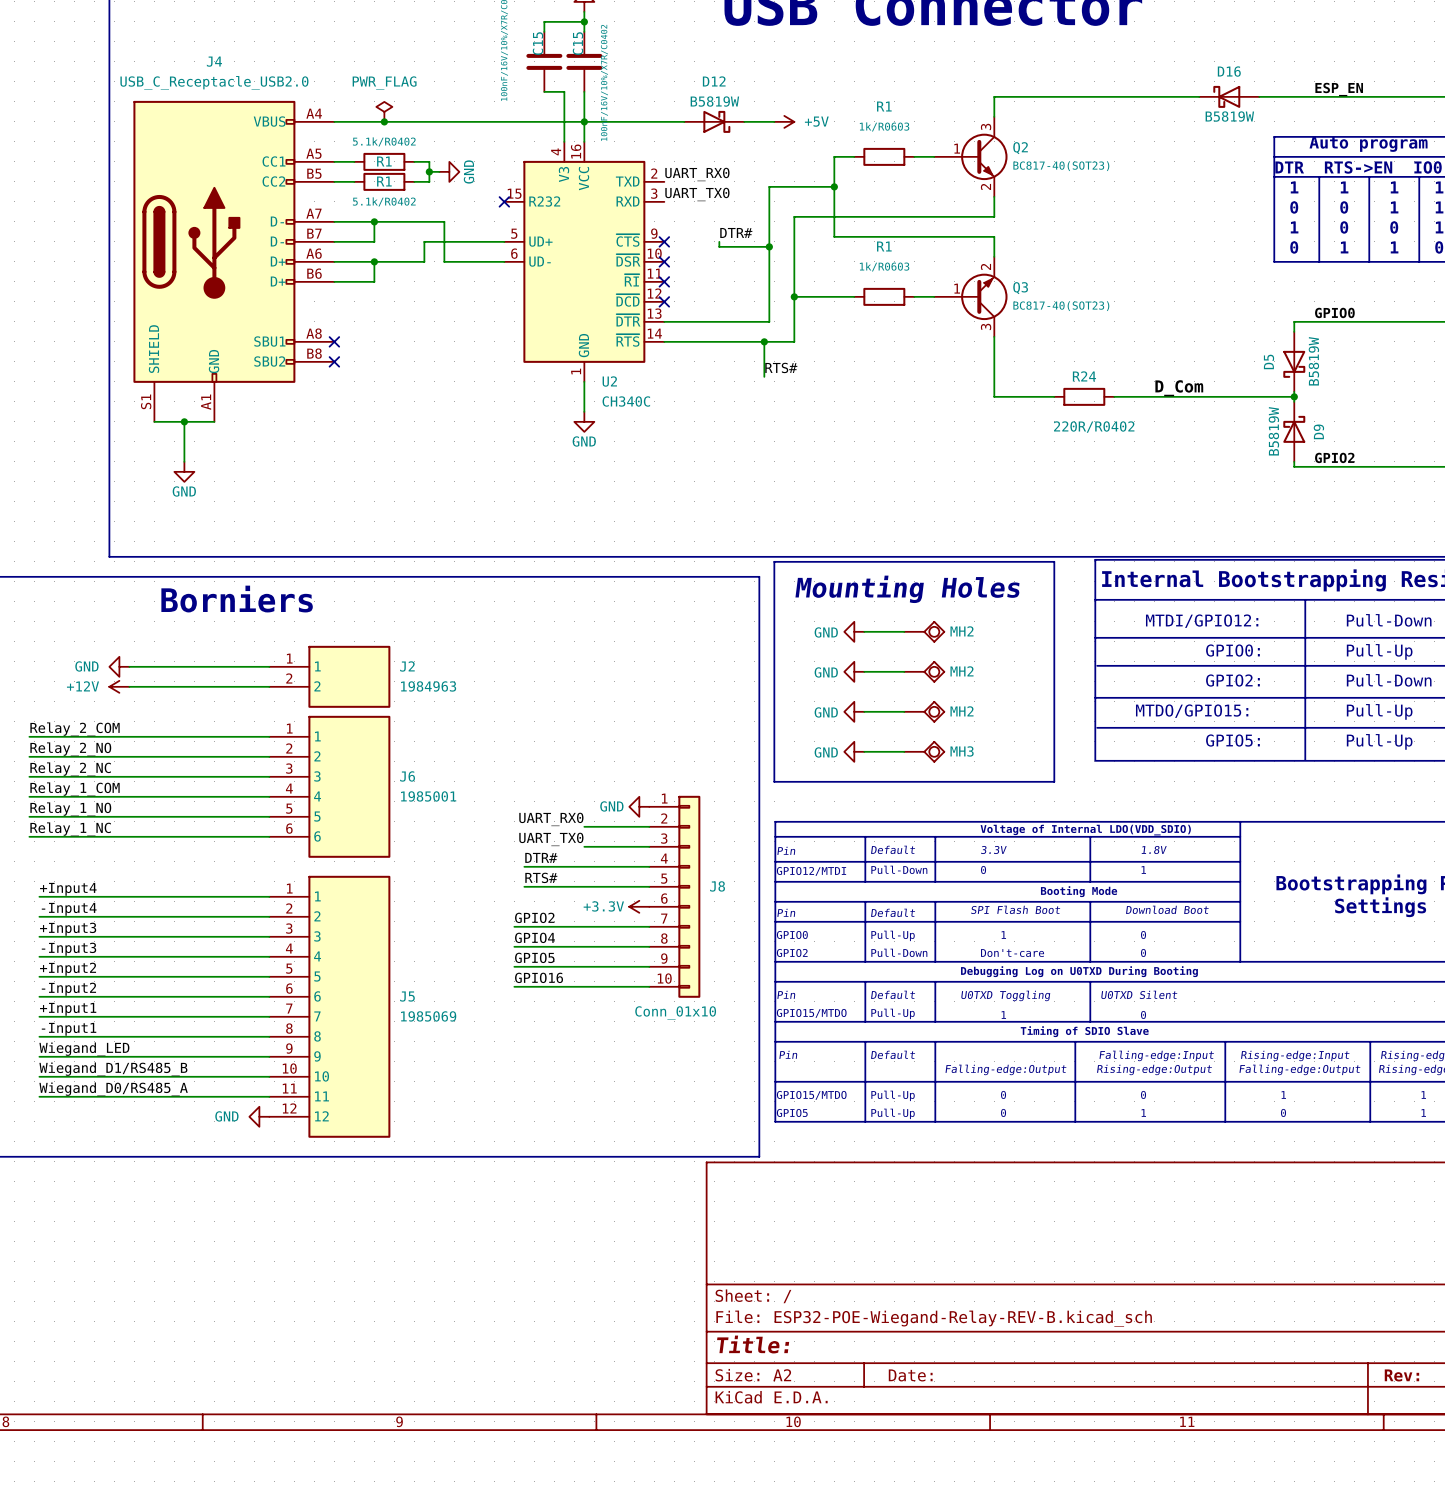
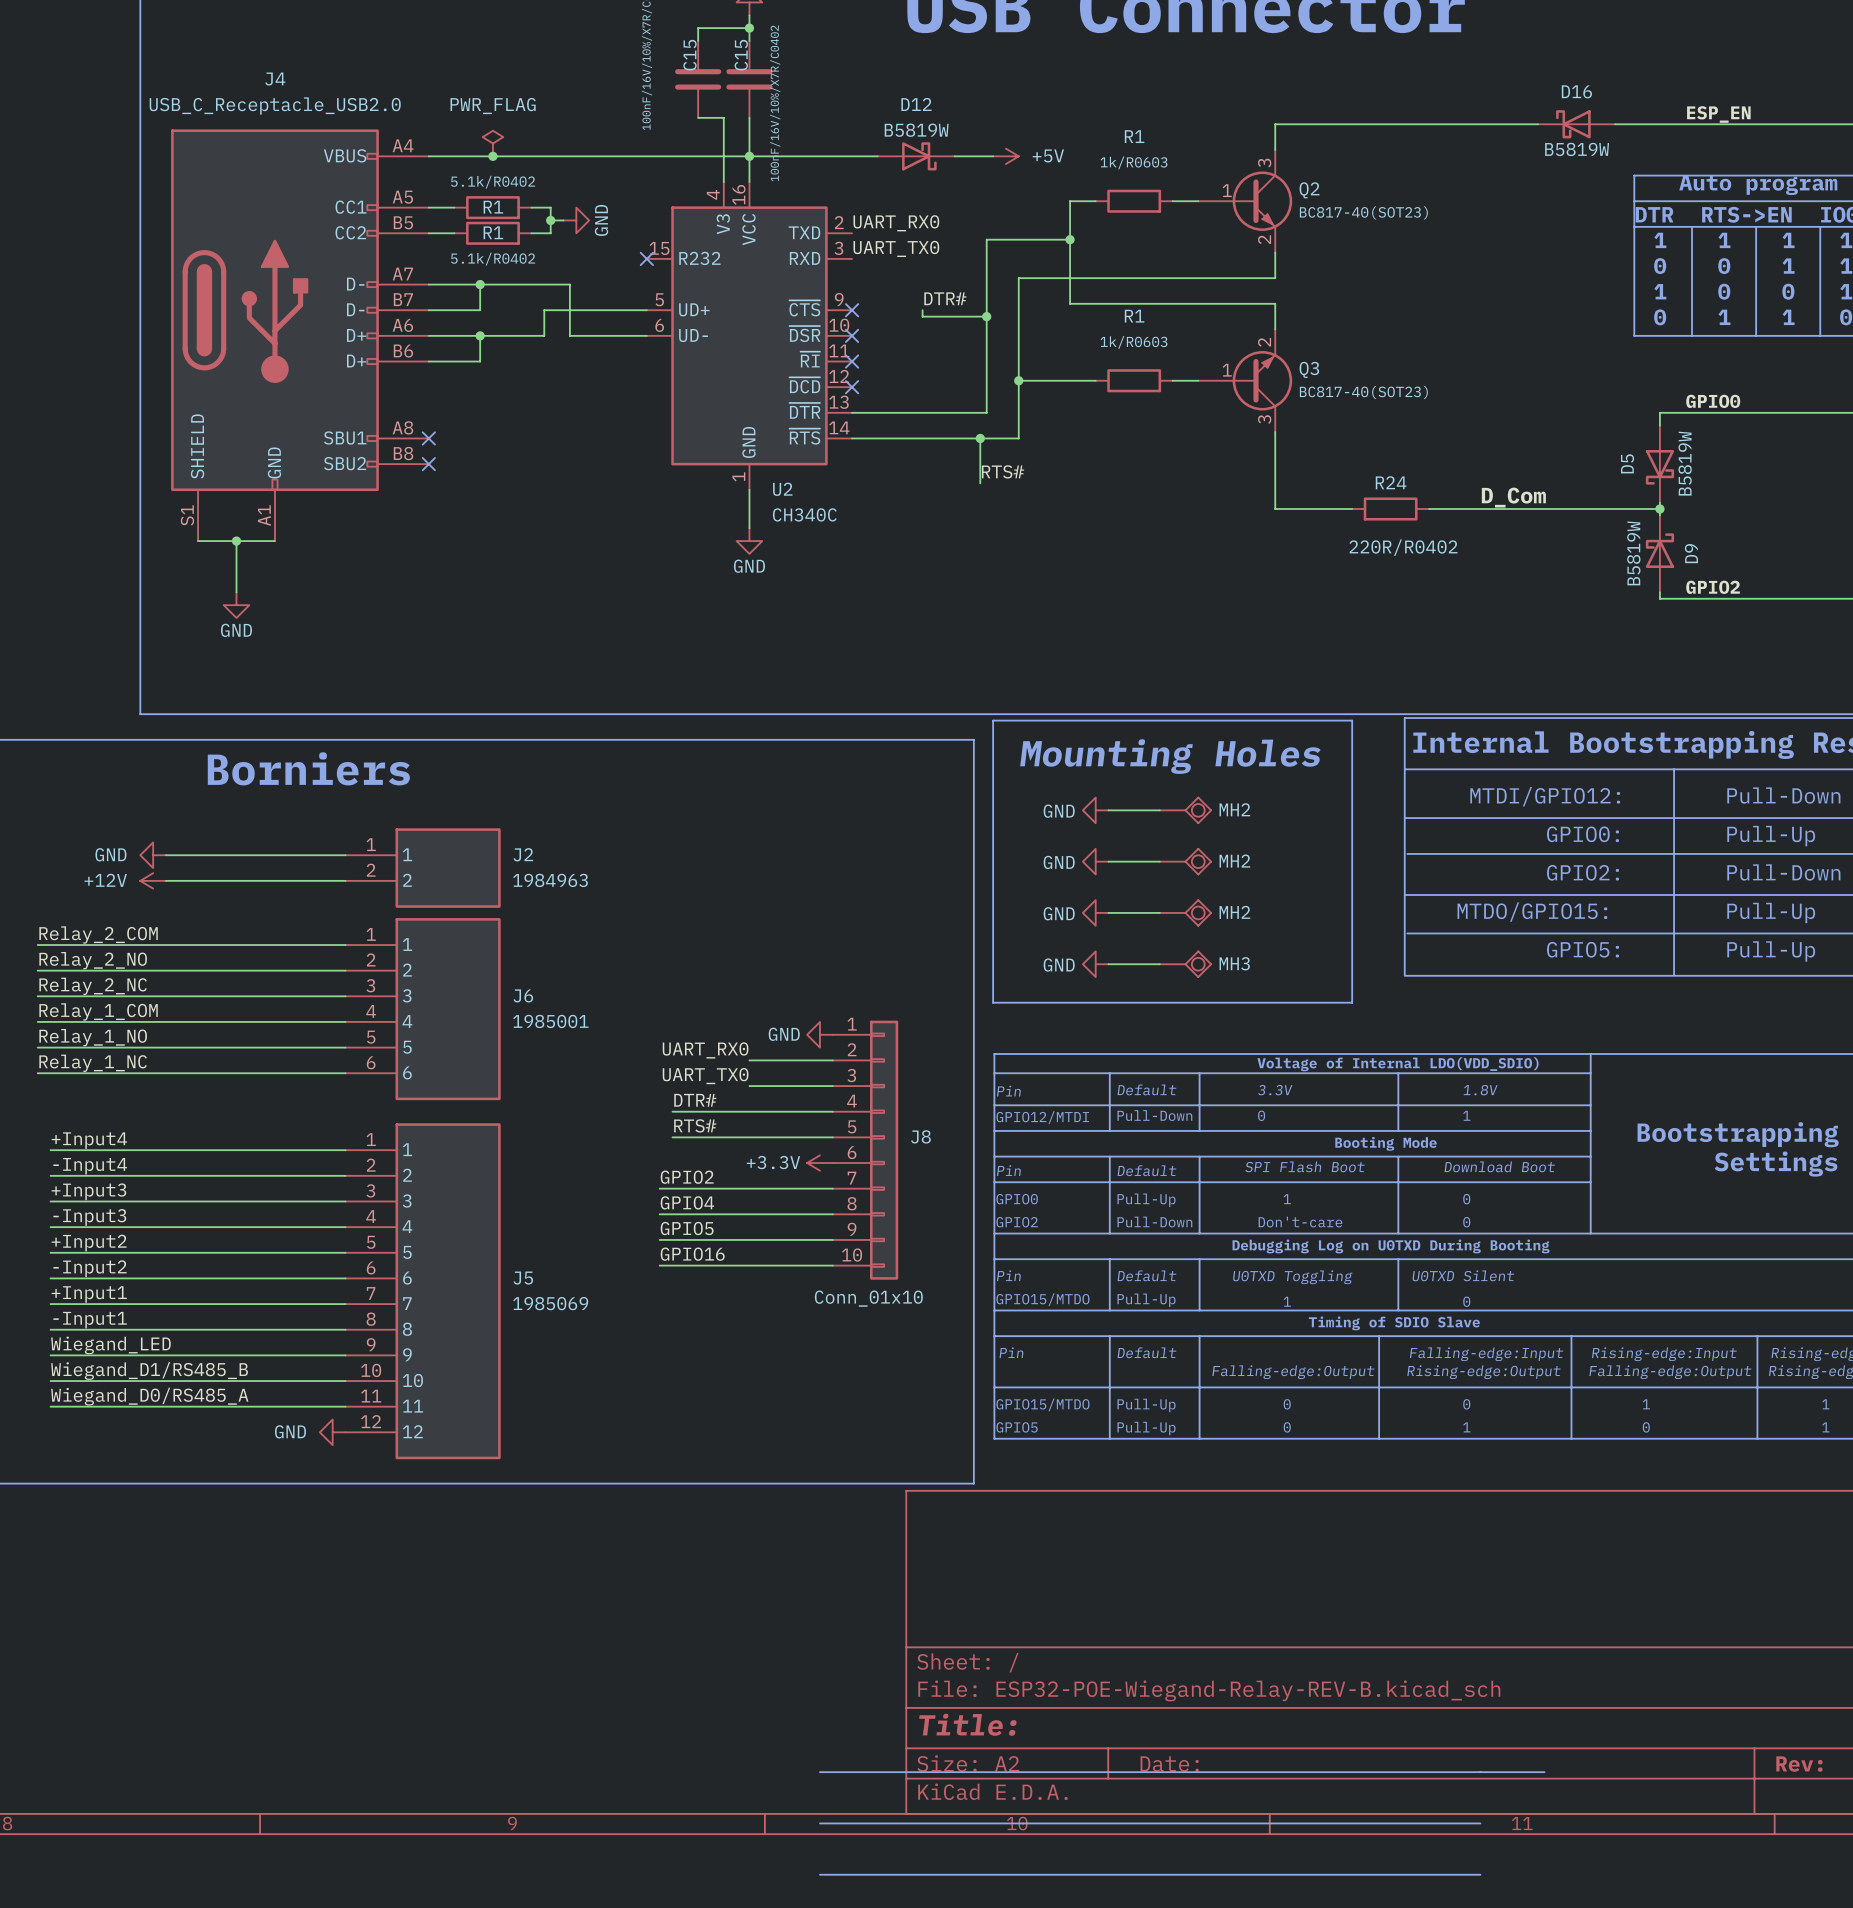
line: none -> (819, 1772) (1544, 1772)
line: none -> (819, 1823) (1480, 1823)
line: none -> (819, 1874) (1480, 1874)

